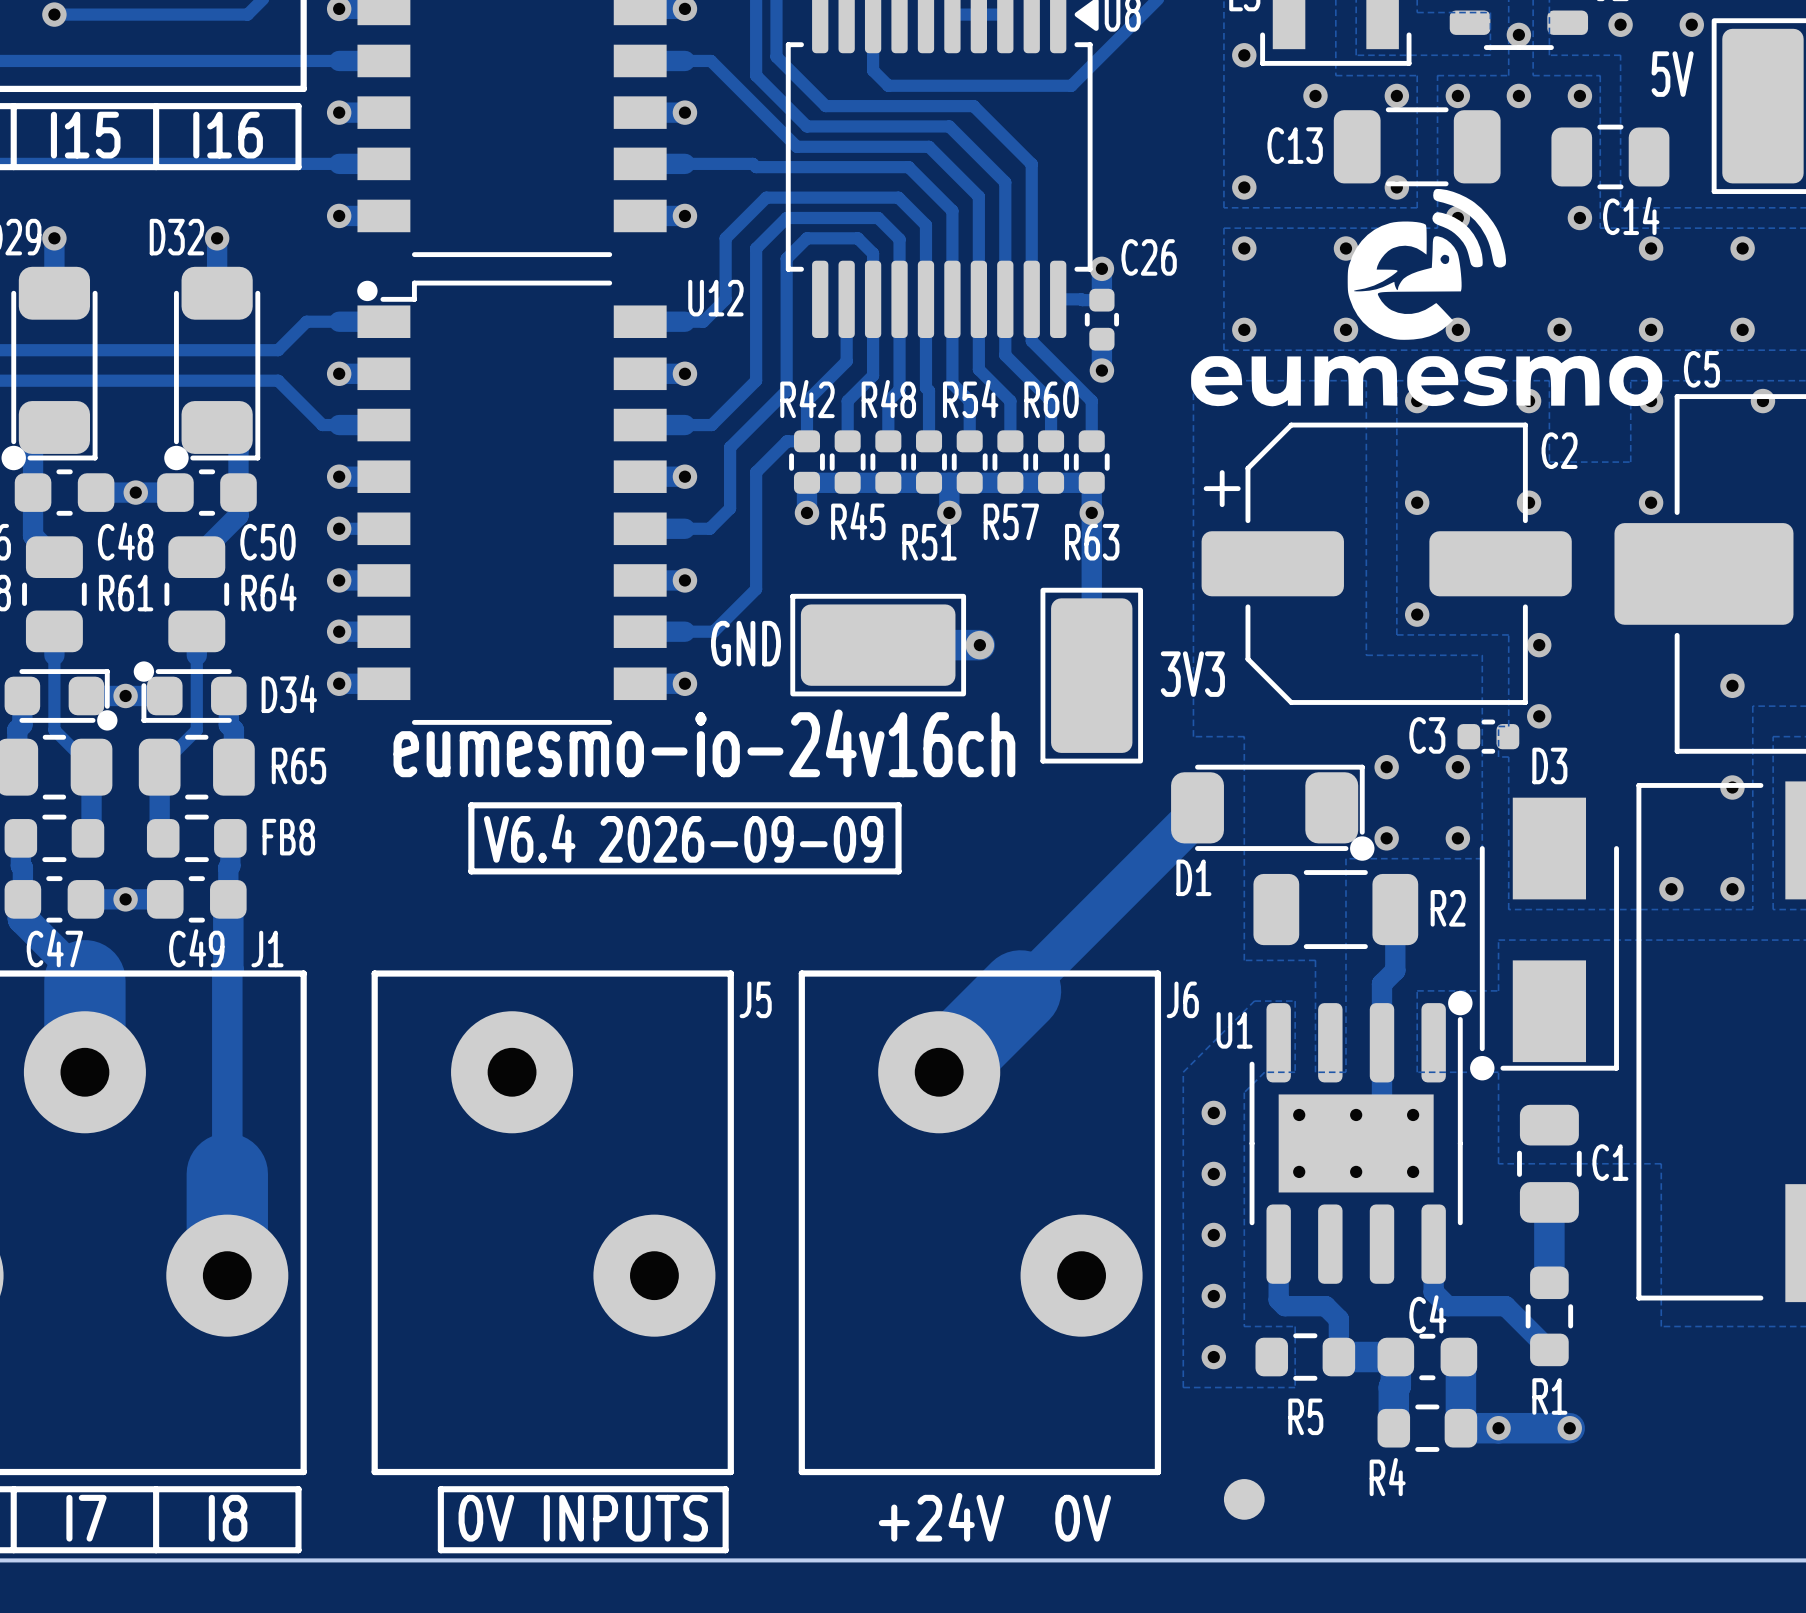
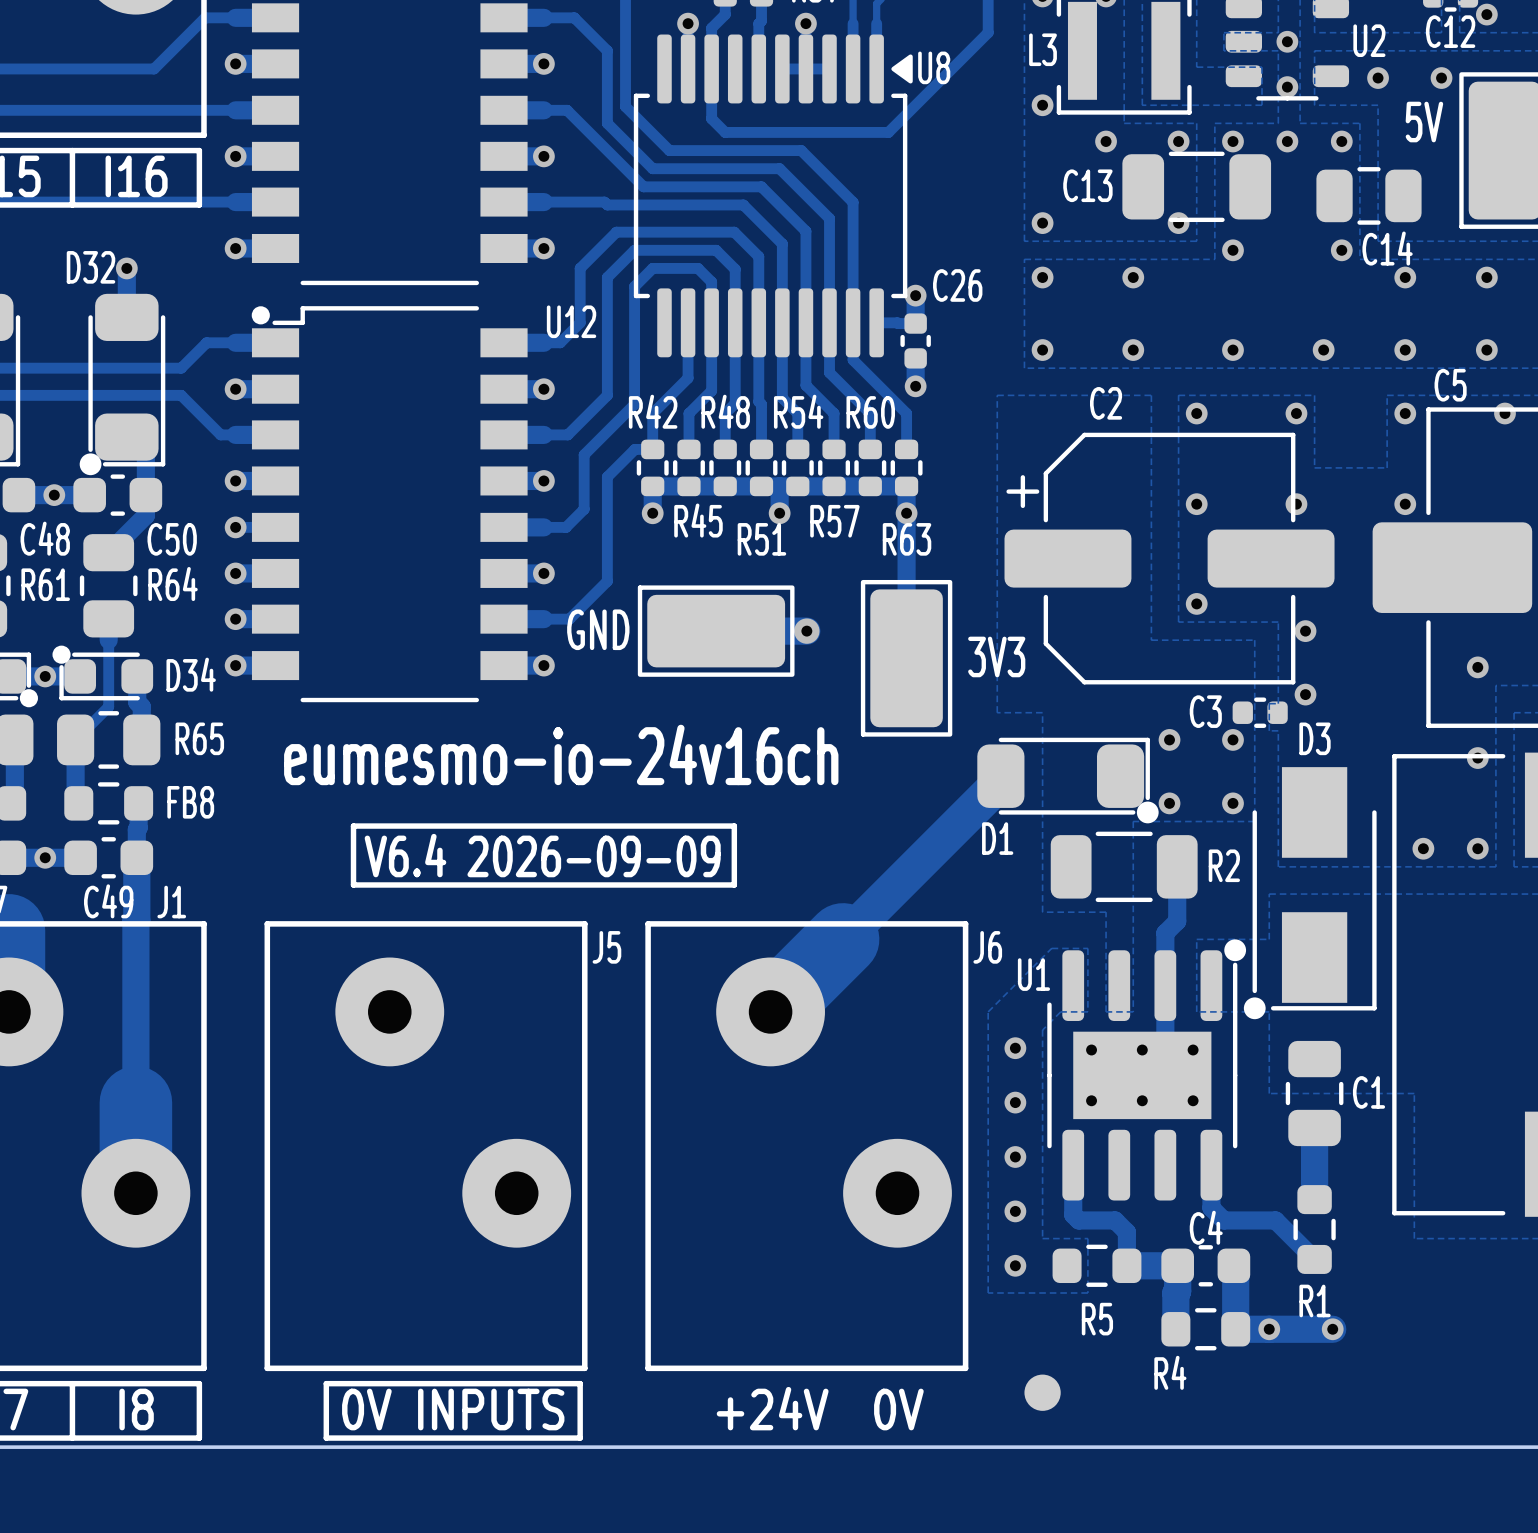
drawing: [1191, 188, 1663, 407] -> none
C2 name position: C2 (1559, 450) -> C2 (1106, 403)
text position: eumesmo-io-24v16ch (704, 743) -> eumesmo-io-24v16ch (561, 754)
text position: V6.4 2026-09-09 (683, 838) -> V6.4 2026-09-09 (542, 855)
line: (471, 863) (471, 805) (898, 805) (898, 863) -> (353, 826) (734, 826)
line: (471, 871) (898, 871) -> (353, 832) (353, 884) (734, 884) (734, 832)

